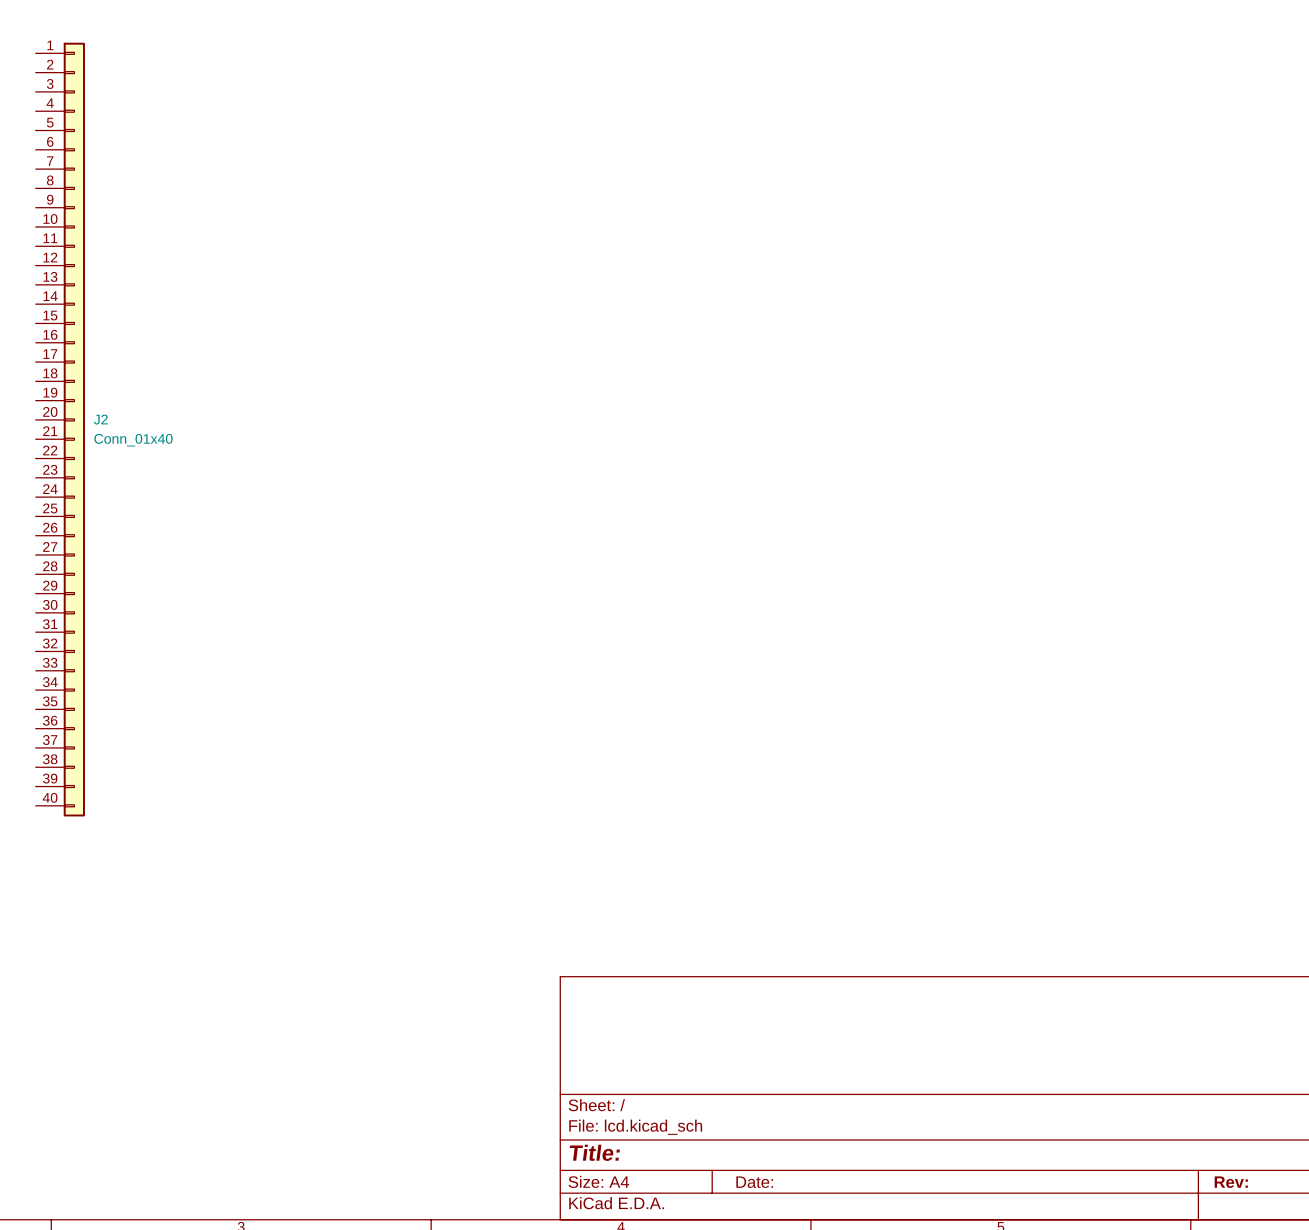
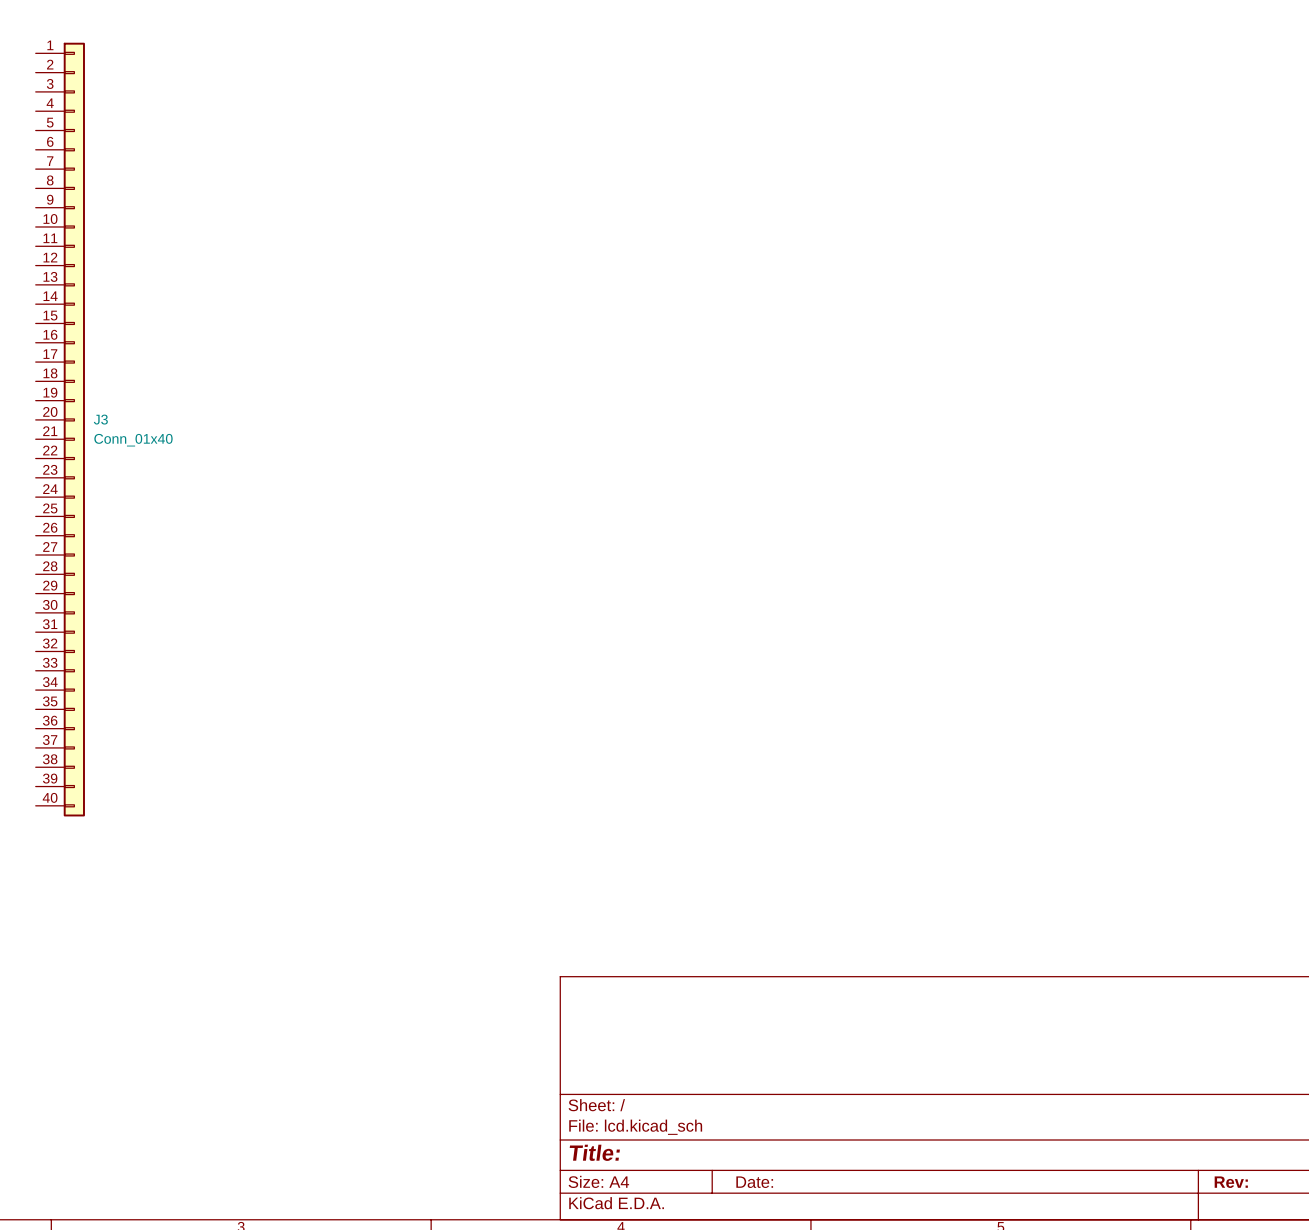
J2 name: J2 (100, 419) -> J3 (100, 419)

